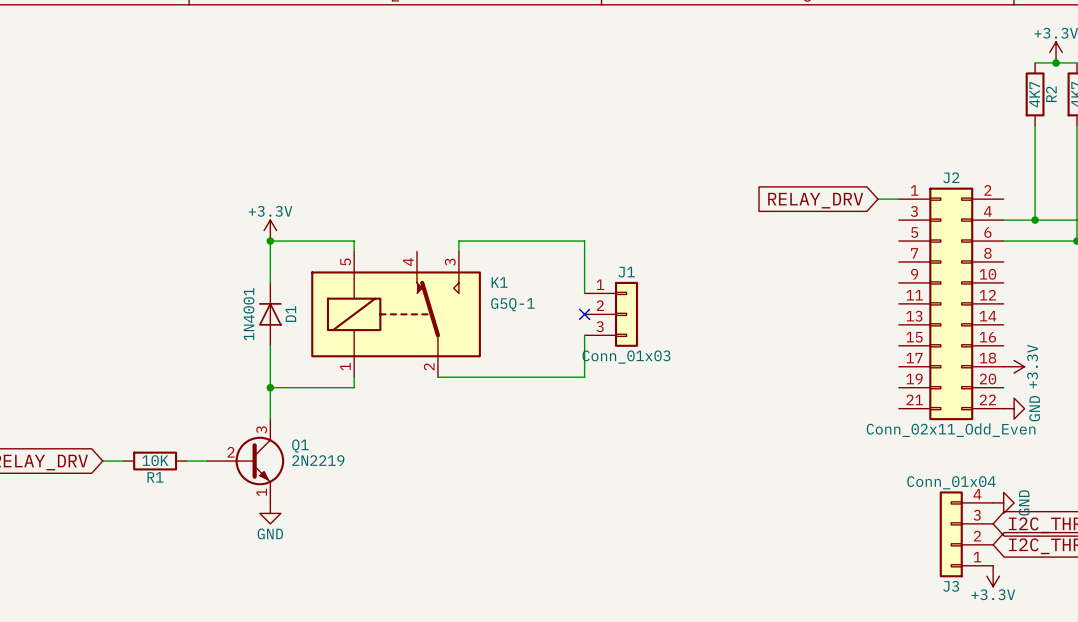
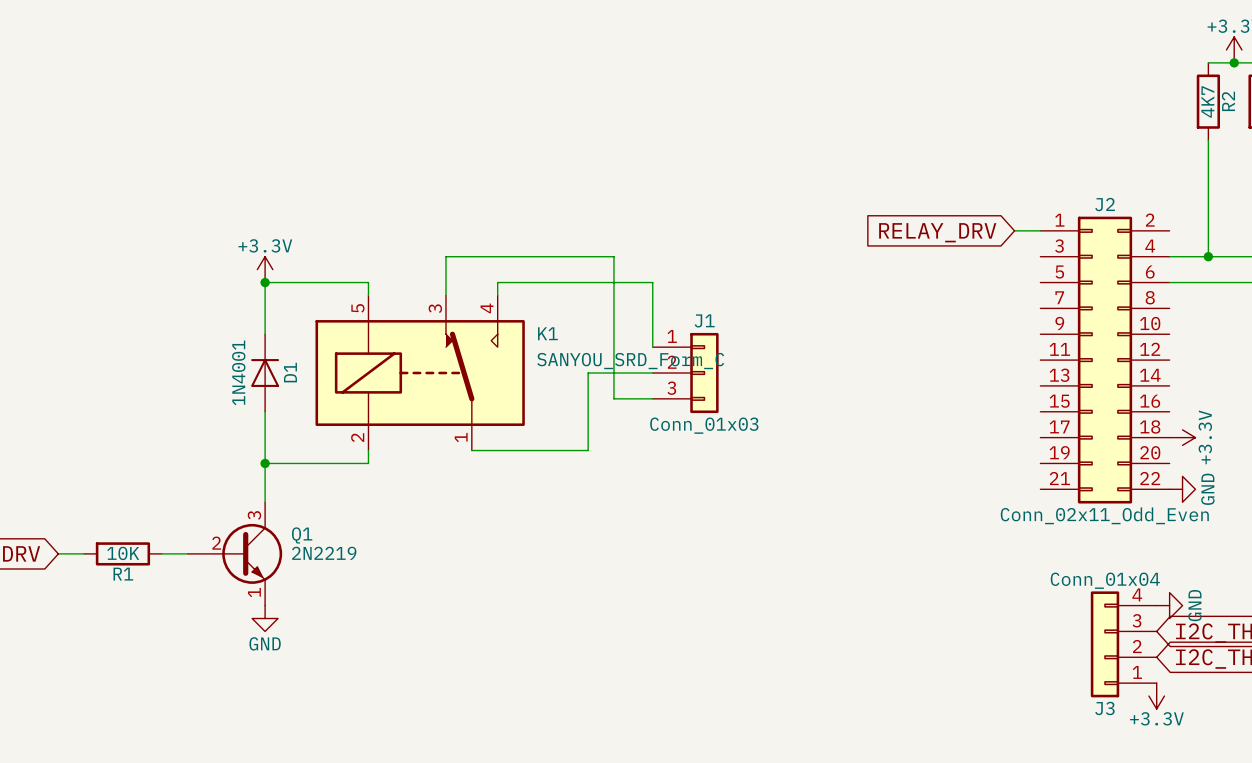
wire: none -> (446, 295) (446, 256) (613, 256) (613, 398) (652, 398)
K1 pin number: 4 (408, 262) -> 3 (435, 308)
K1 pin number: 3 (450, 262) -> 4 (487, 308)
K1 value: G5Q-1 (512, 304) -> SANYOU_SRD_Form_C (630, 361)
no-connect mark: (584, 314) -> none
wire: (584, 335) (584, 377) (532, 377) -> (652, 373) (588, 373) (588, 450)
K1 pin number: 1 (345, 366) -> 2 (357, 437)
K1 pin number: 2 (429, 366) -> 1 (461, 437)

